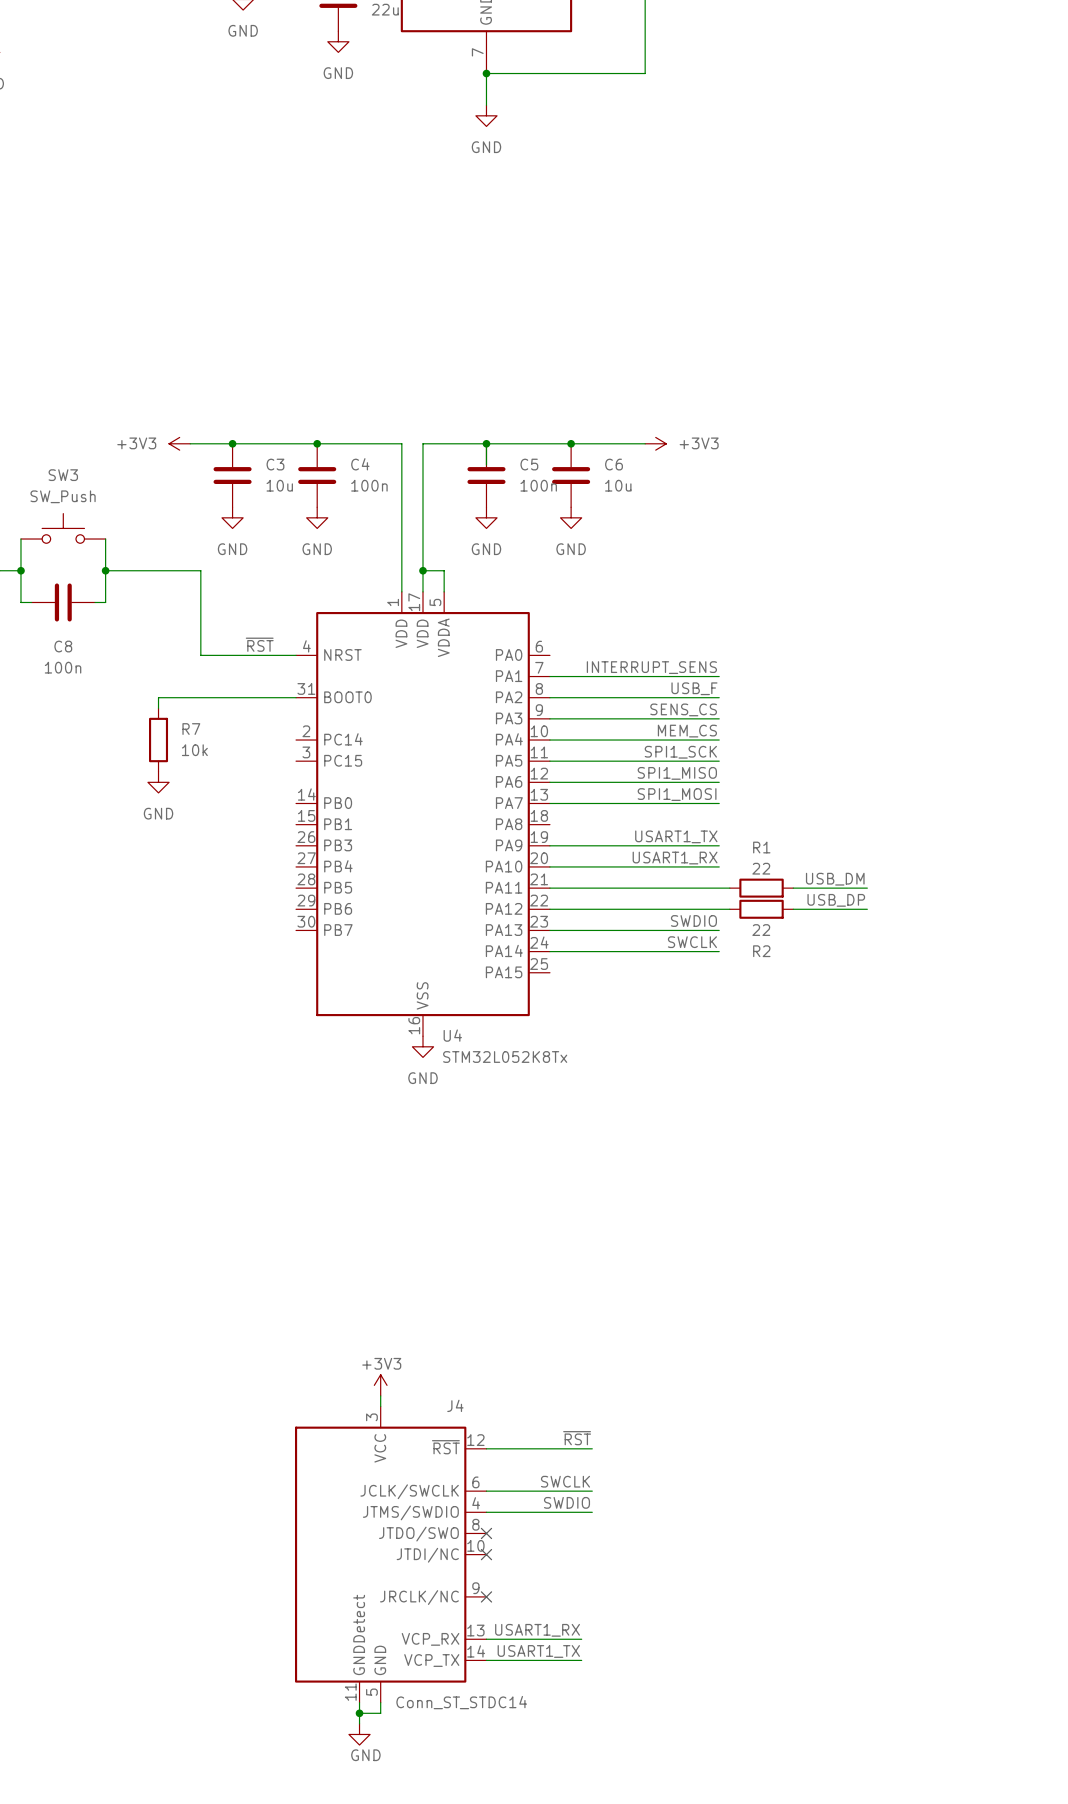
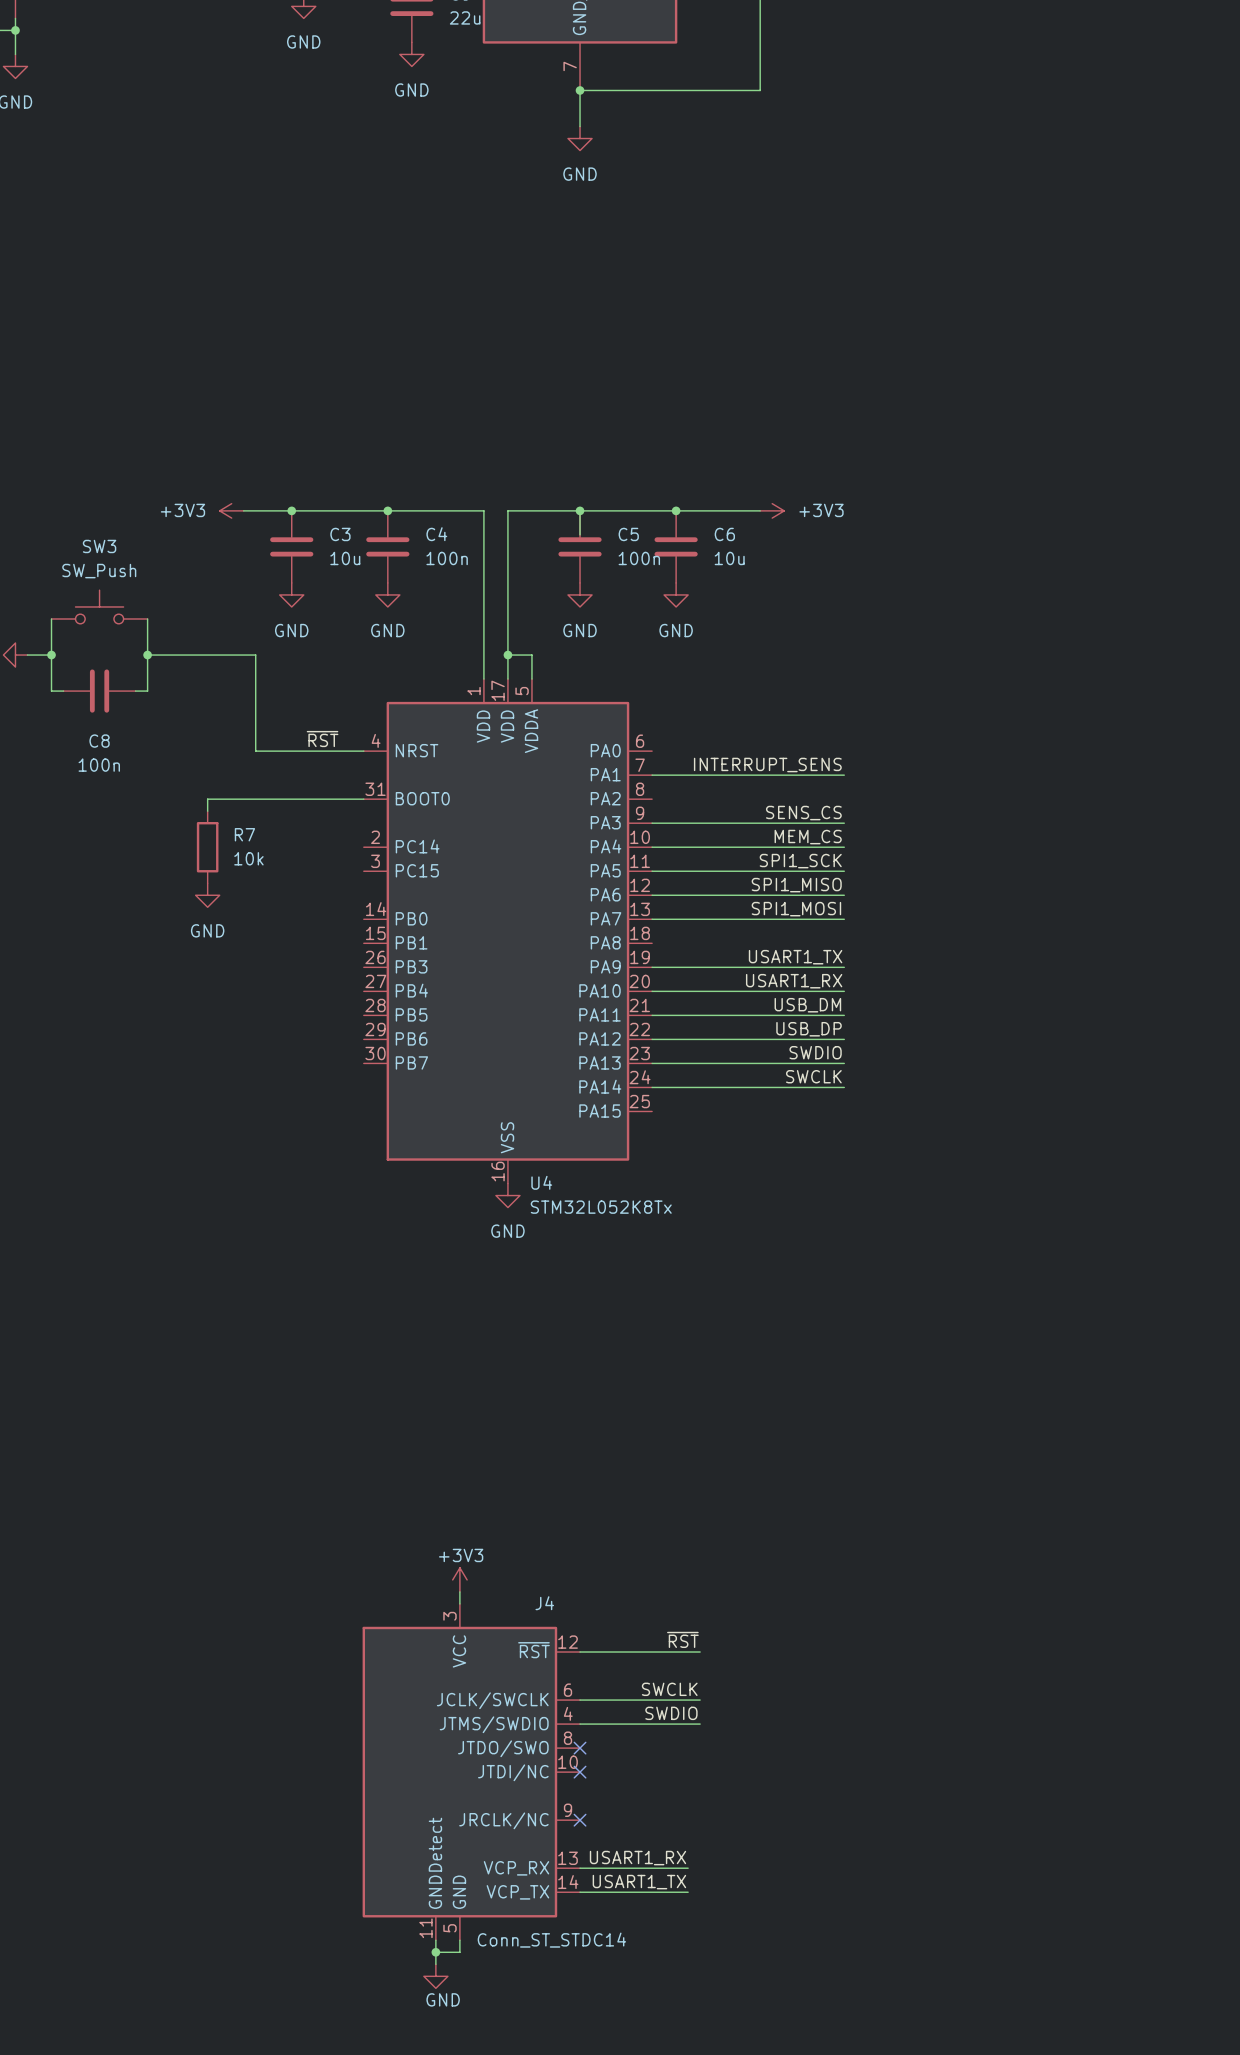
label: USB_F (694, 688) -> none
wire: (549, 697) (719, 697) -> none
label position: USB_DM (835, 879) -> USB_DM (807, 1005)
wire: (719, 888) (729, 888) -> none
R1: 22 (761, 888) -> none
wire: (793, 888) (867, 888) -> none
label position: USB_DP (836, 900) -> USB_DP (809, 1029)
wire: (719, 909) (729, 909) -> none
R2: 22 (761, 909) -> none
wire: (793, 909) (867, 909) -> none

